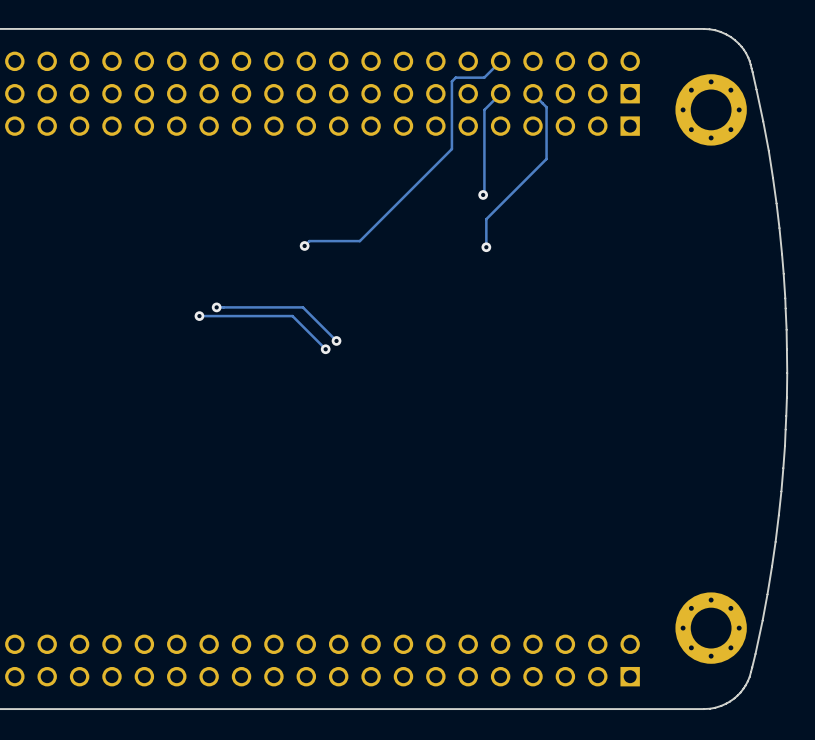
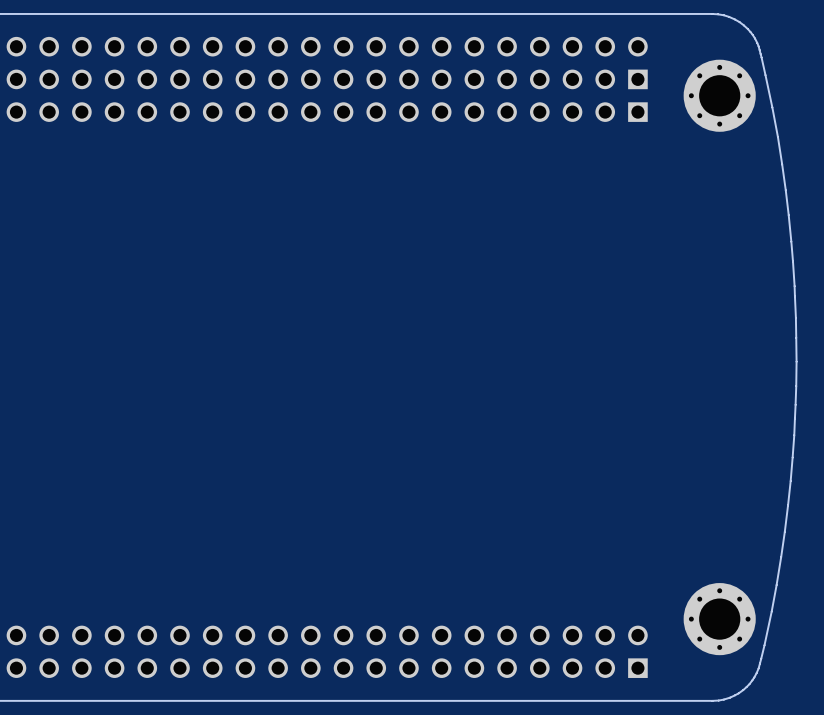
track: (500, 61) (484, 77) (455, 77) (451, 81) (451, 149) (359, 241) (309, 241) (304, 245) -> none
track: (500, 93) (484, 109) (483, 194) -> none
track: (533, 93) (546, 107) (546, 158) (486, 219) (486, 247) -> none
via: (483, 194) -> none
via: (304, 245) -> none
via: (486, 247) -> none
track: (216, 307) (302, 307) (336, 340) -> none
via: (216, 307) -> none
track: (199, 316) (292, 316) (325, 349) -> none
via: (199, 316) -> none
via: (336, 340) -> none
via: (325, 349) -> none

